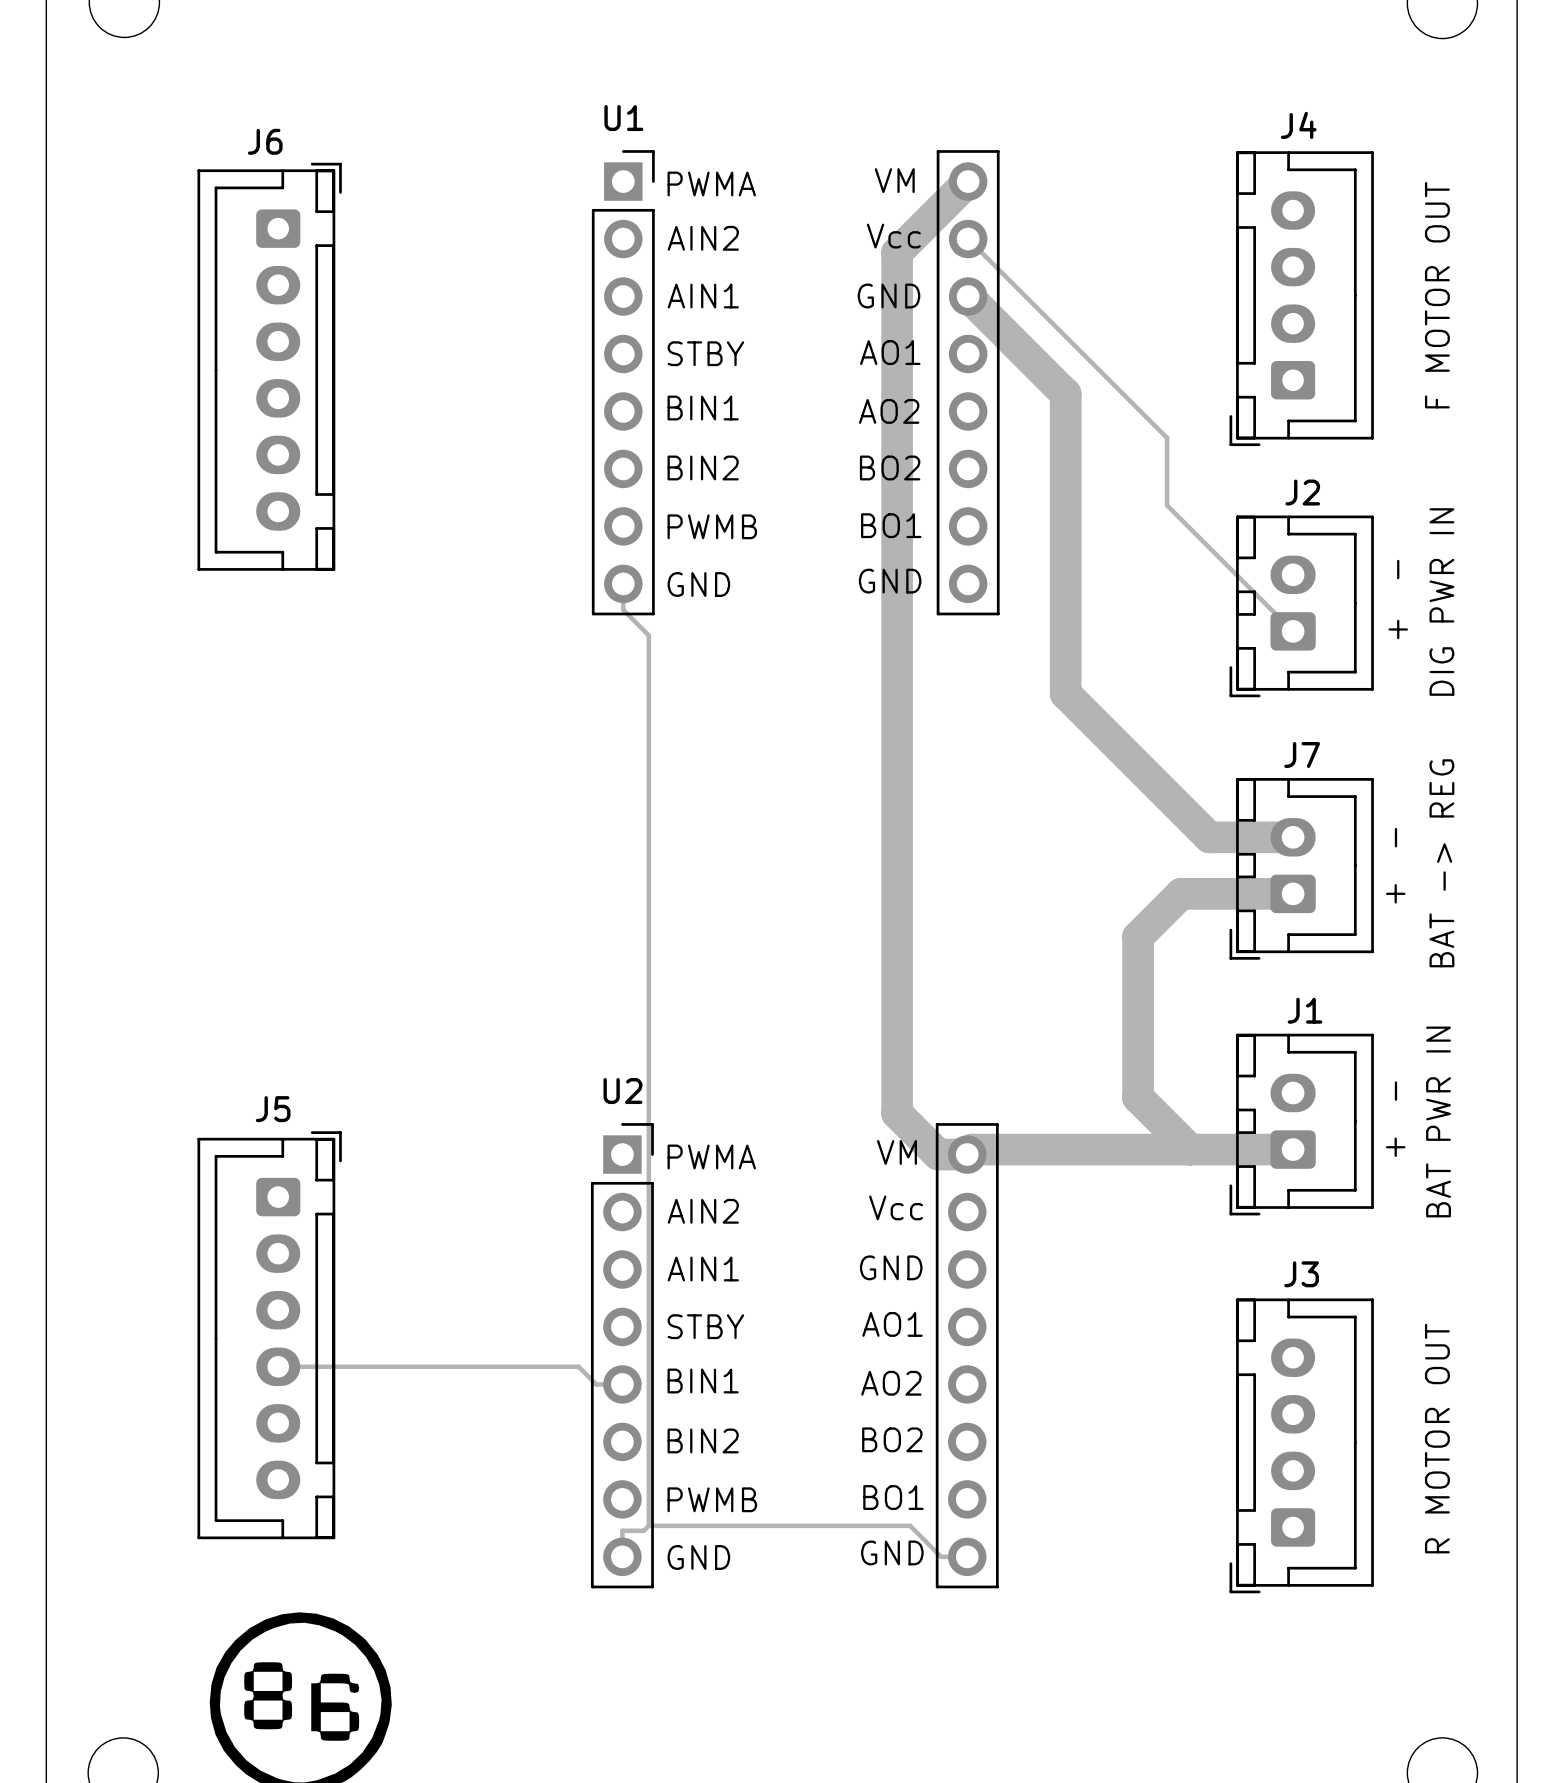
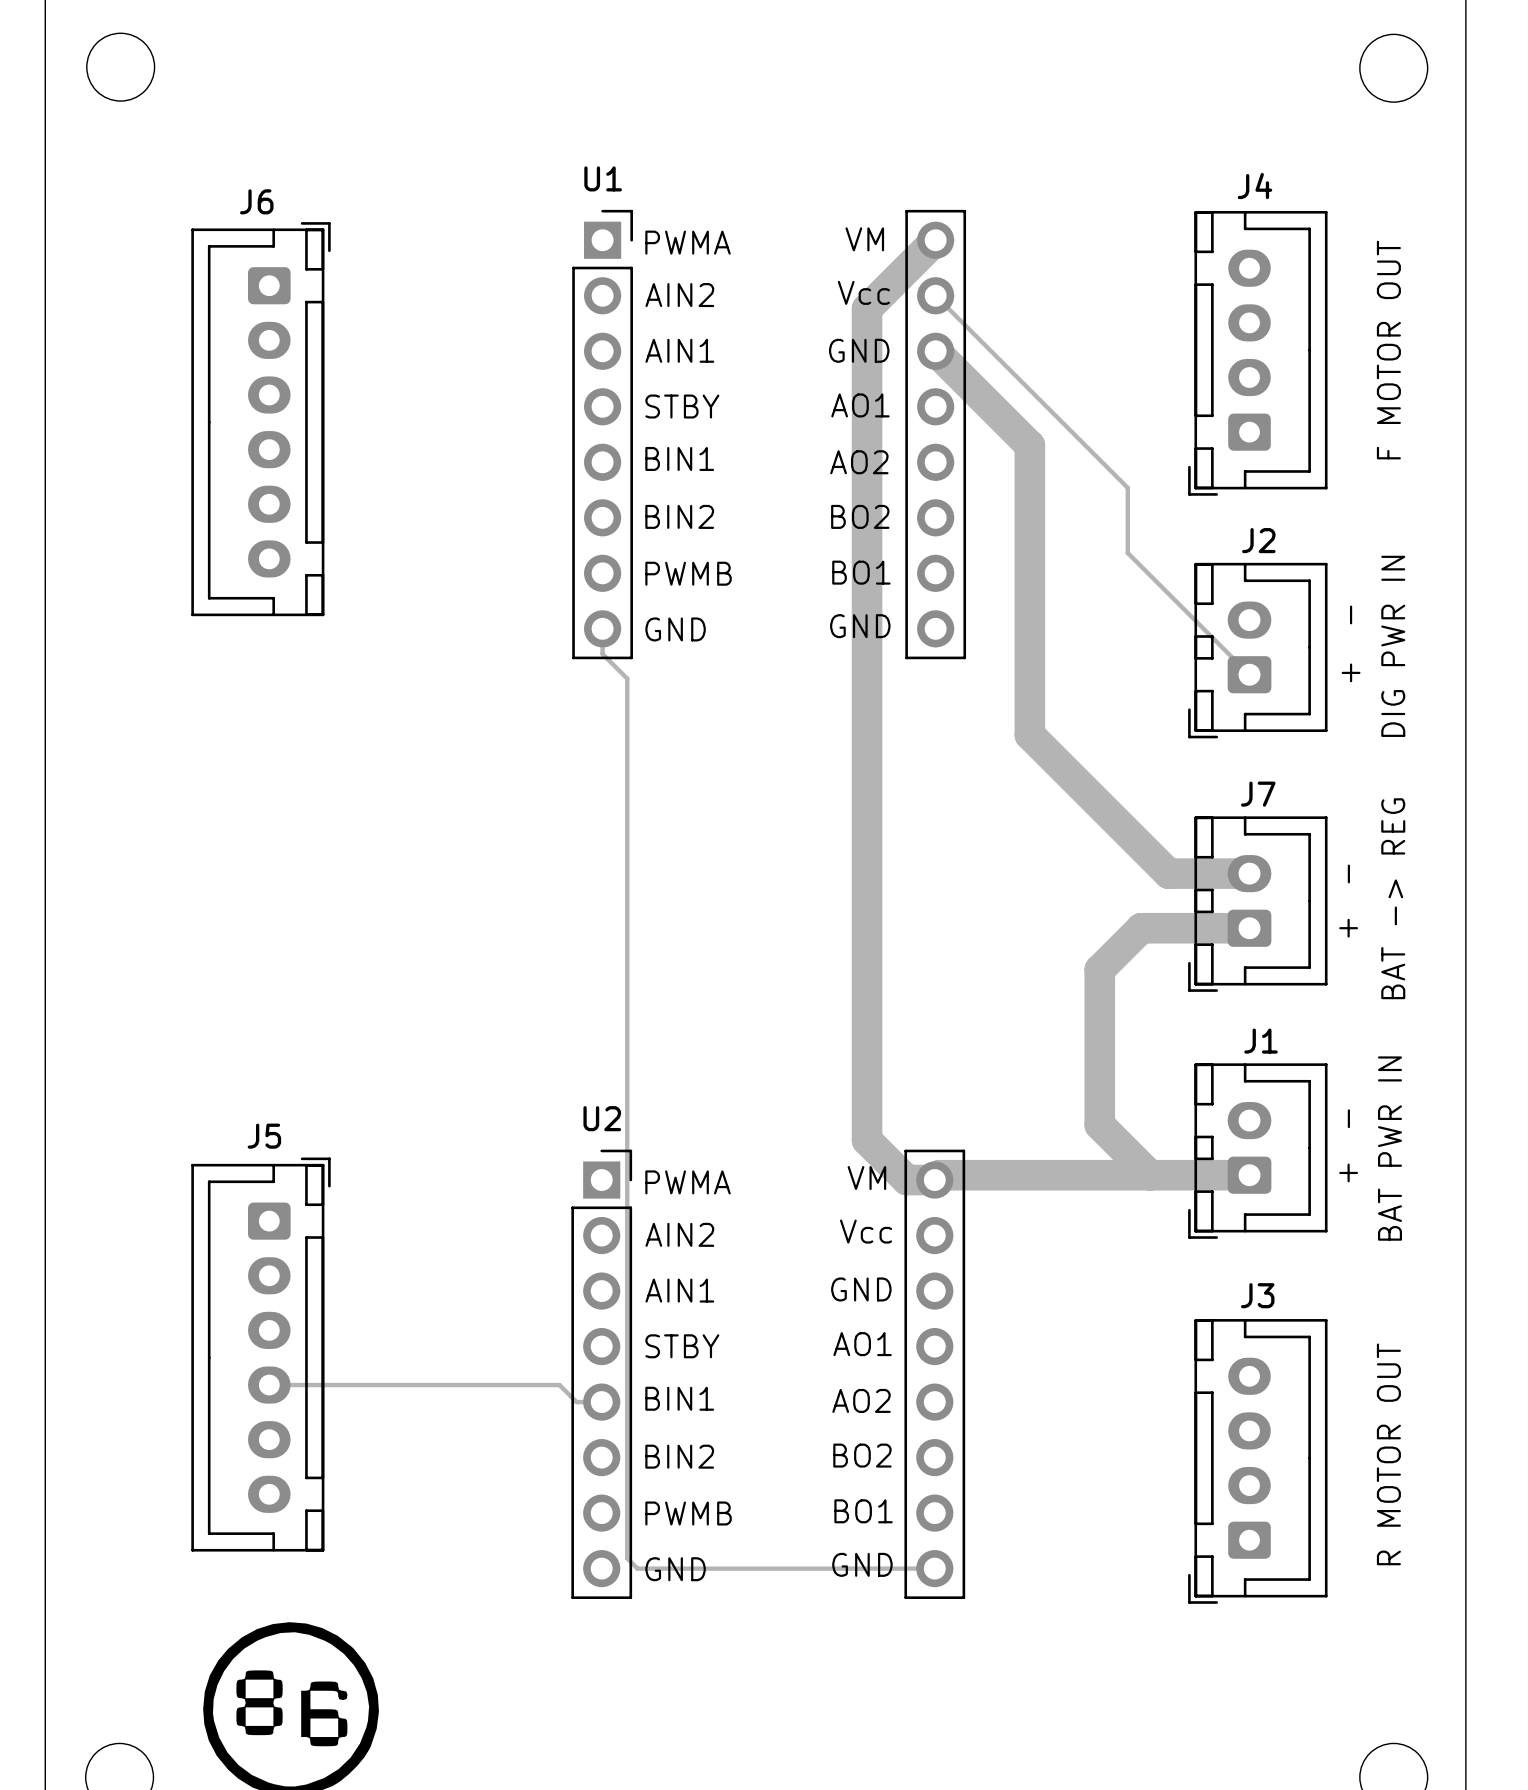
track: (622, 1556) (622, 1530) (643, 1530) (648, 1525) (910, 1525) (941, 1556) -> (627, 1538) (627, 1558) (637, 1568) (909, 1568)

